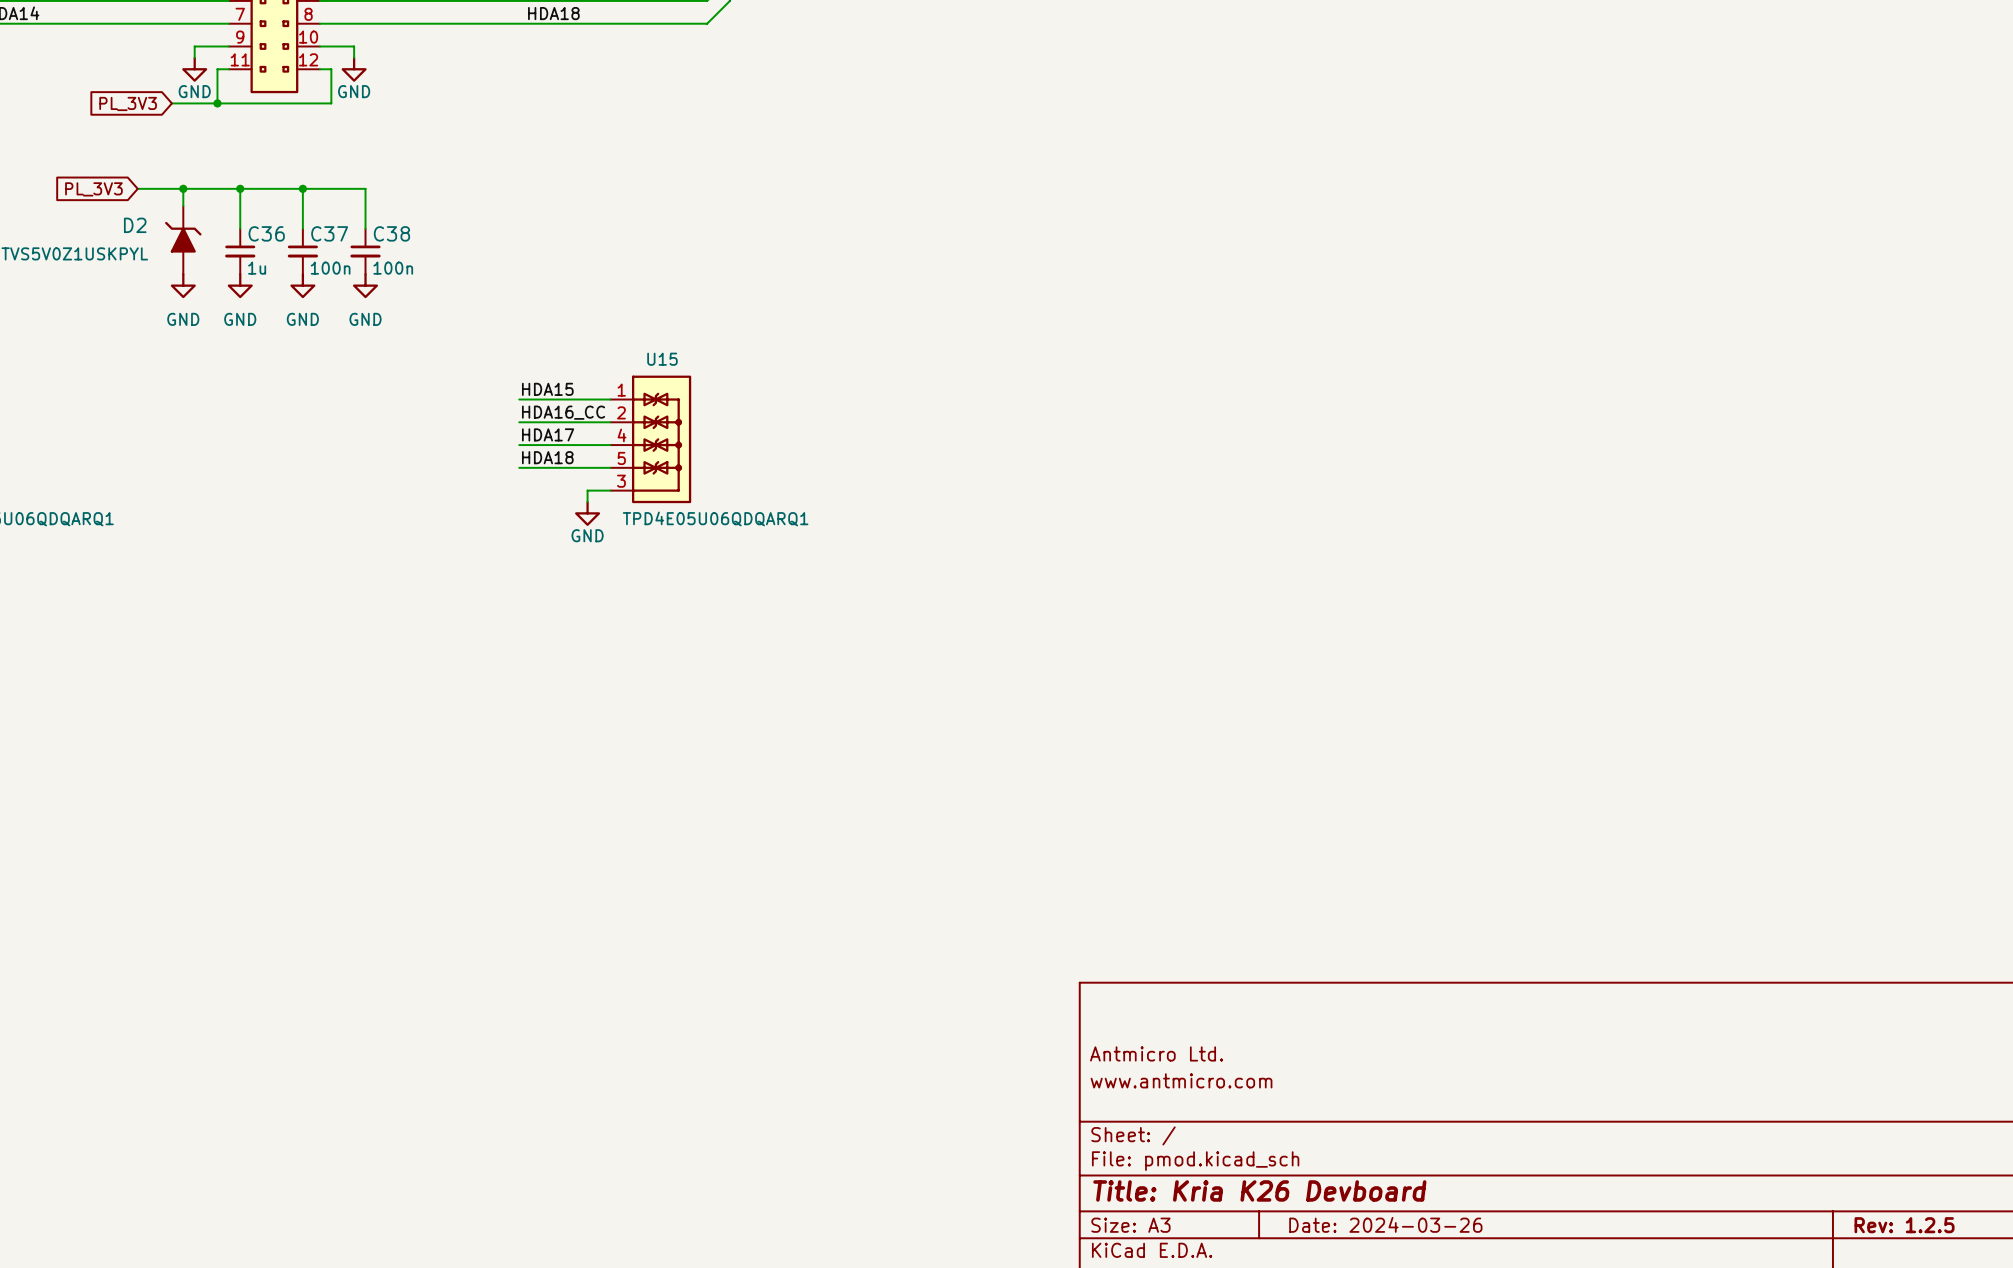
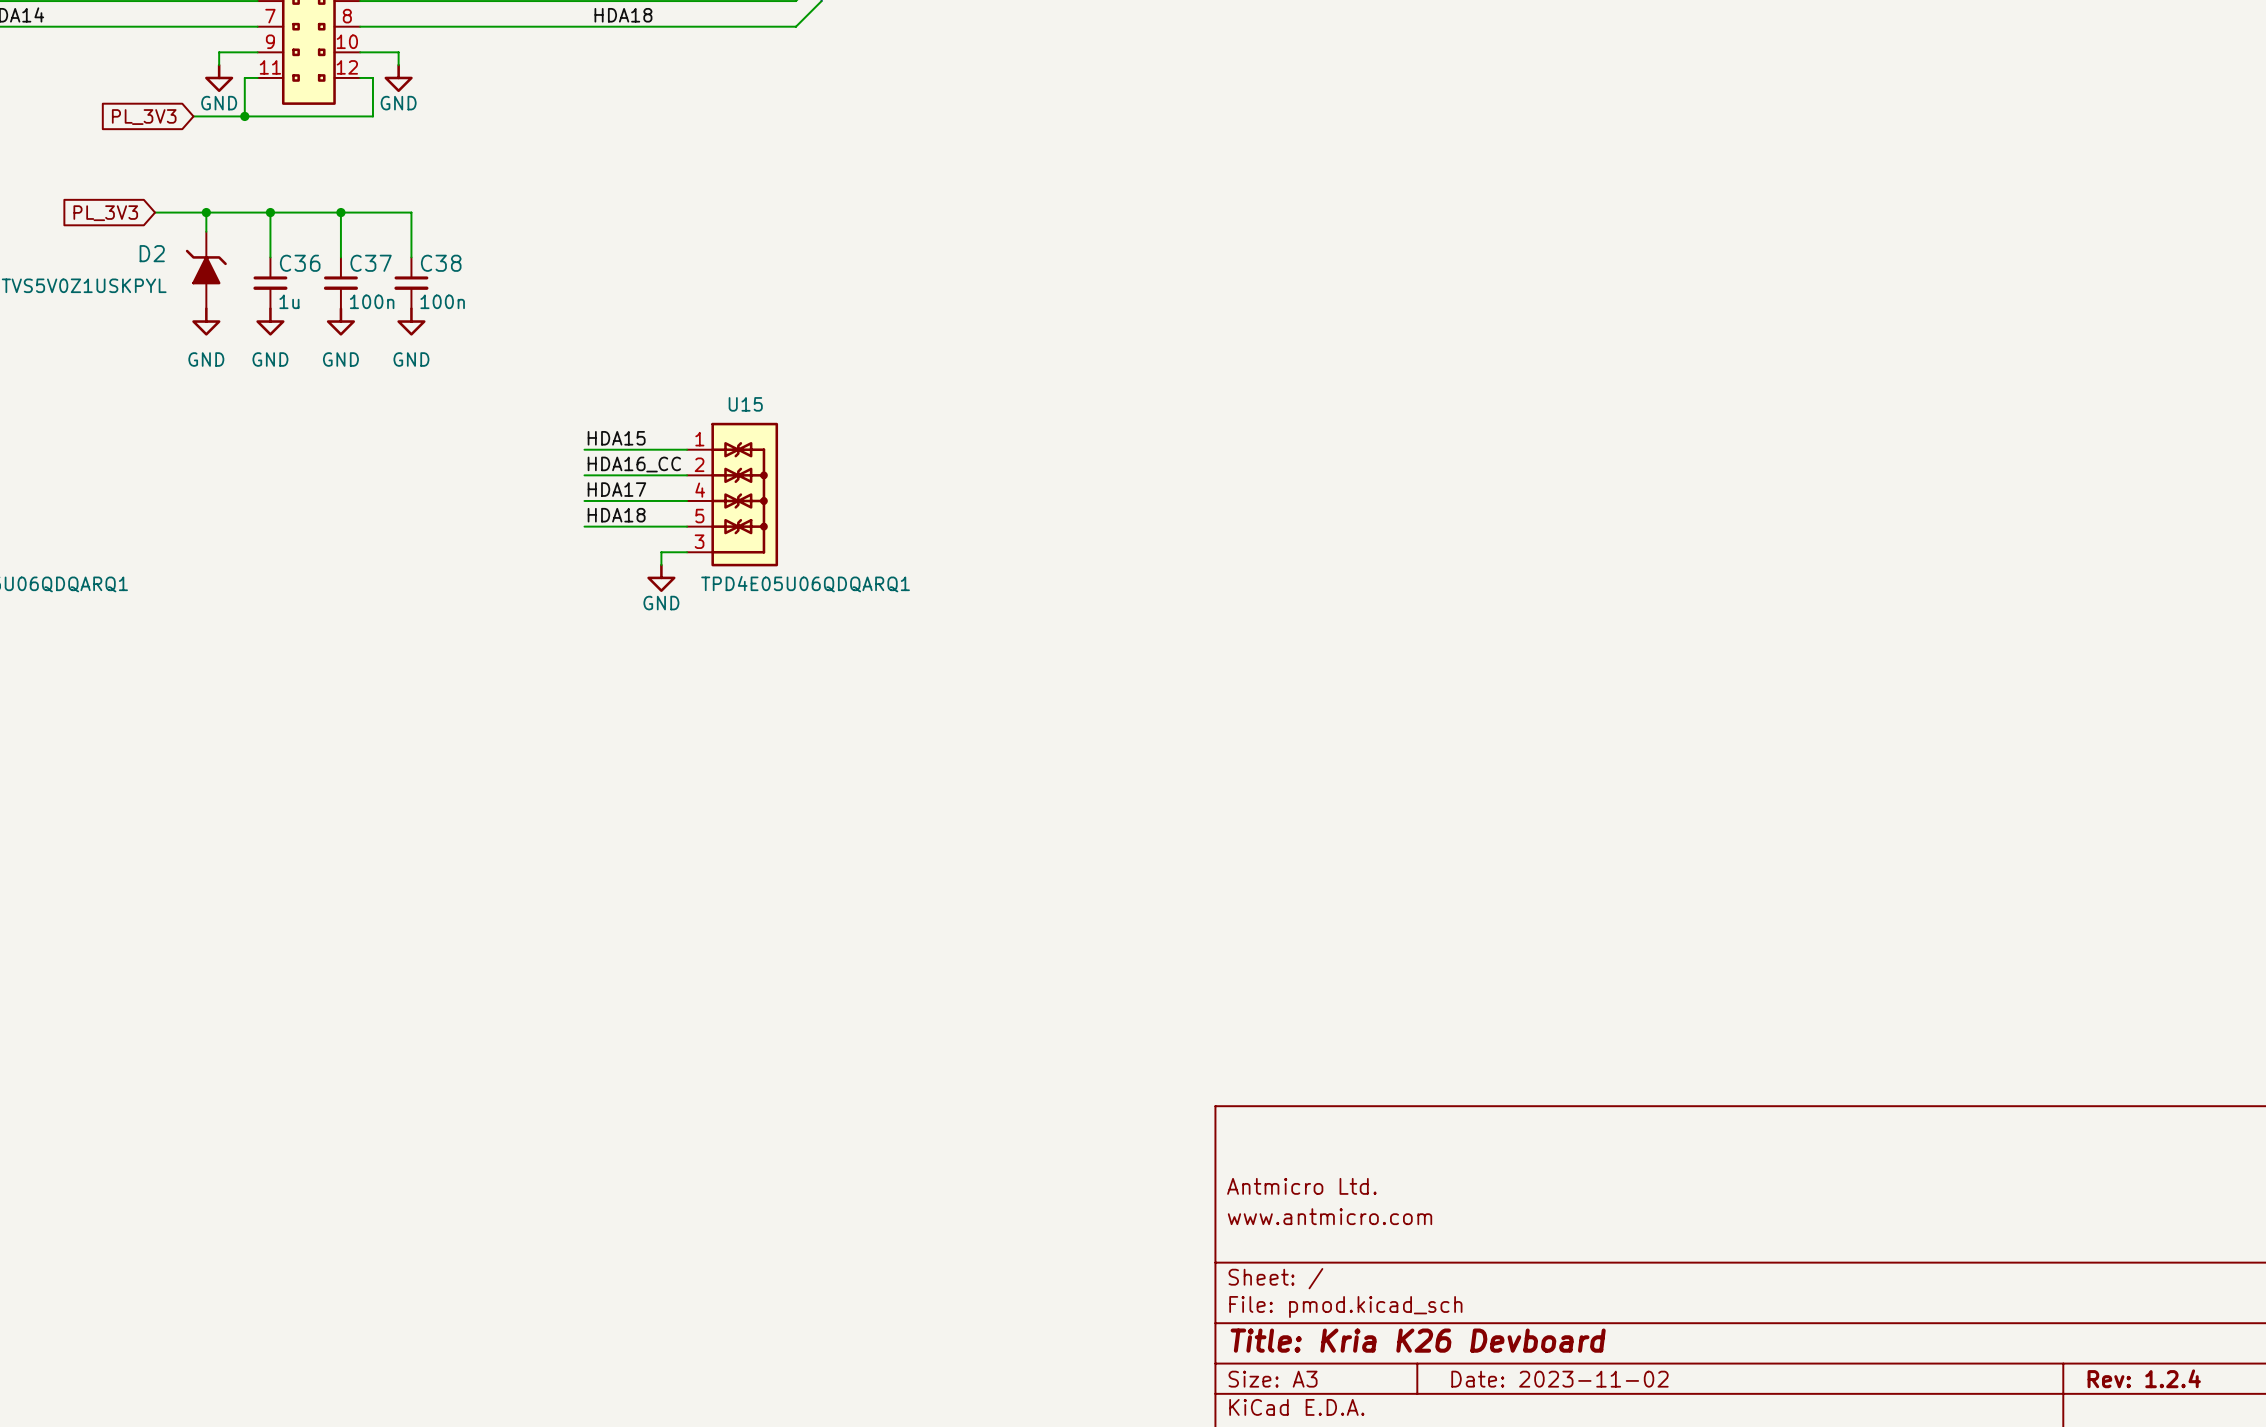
title block: Date: 2024-03-26 (1385, 1224) -> Date: 2023-11-02 (1559, 1379)
title block: Rev: 1.2.5 (1904, 1225) -> Rev: 1.2.4 (2144, 1378)

